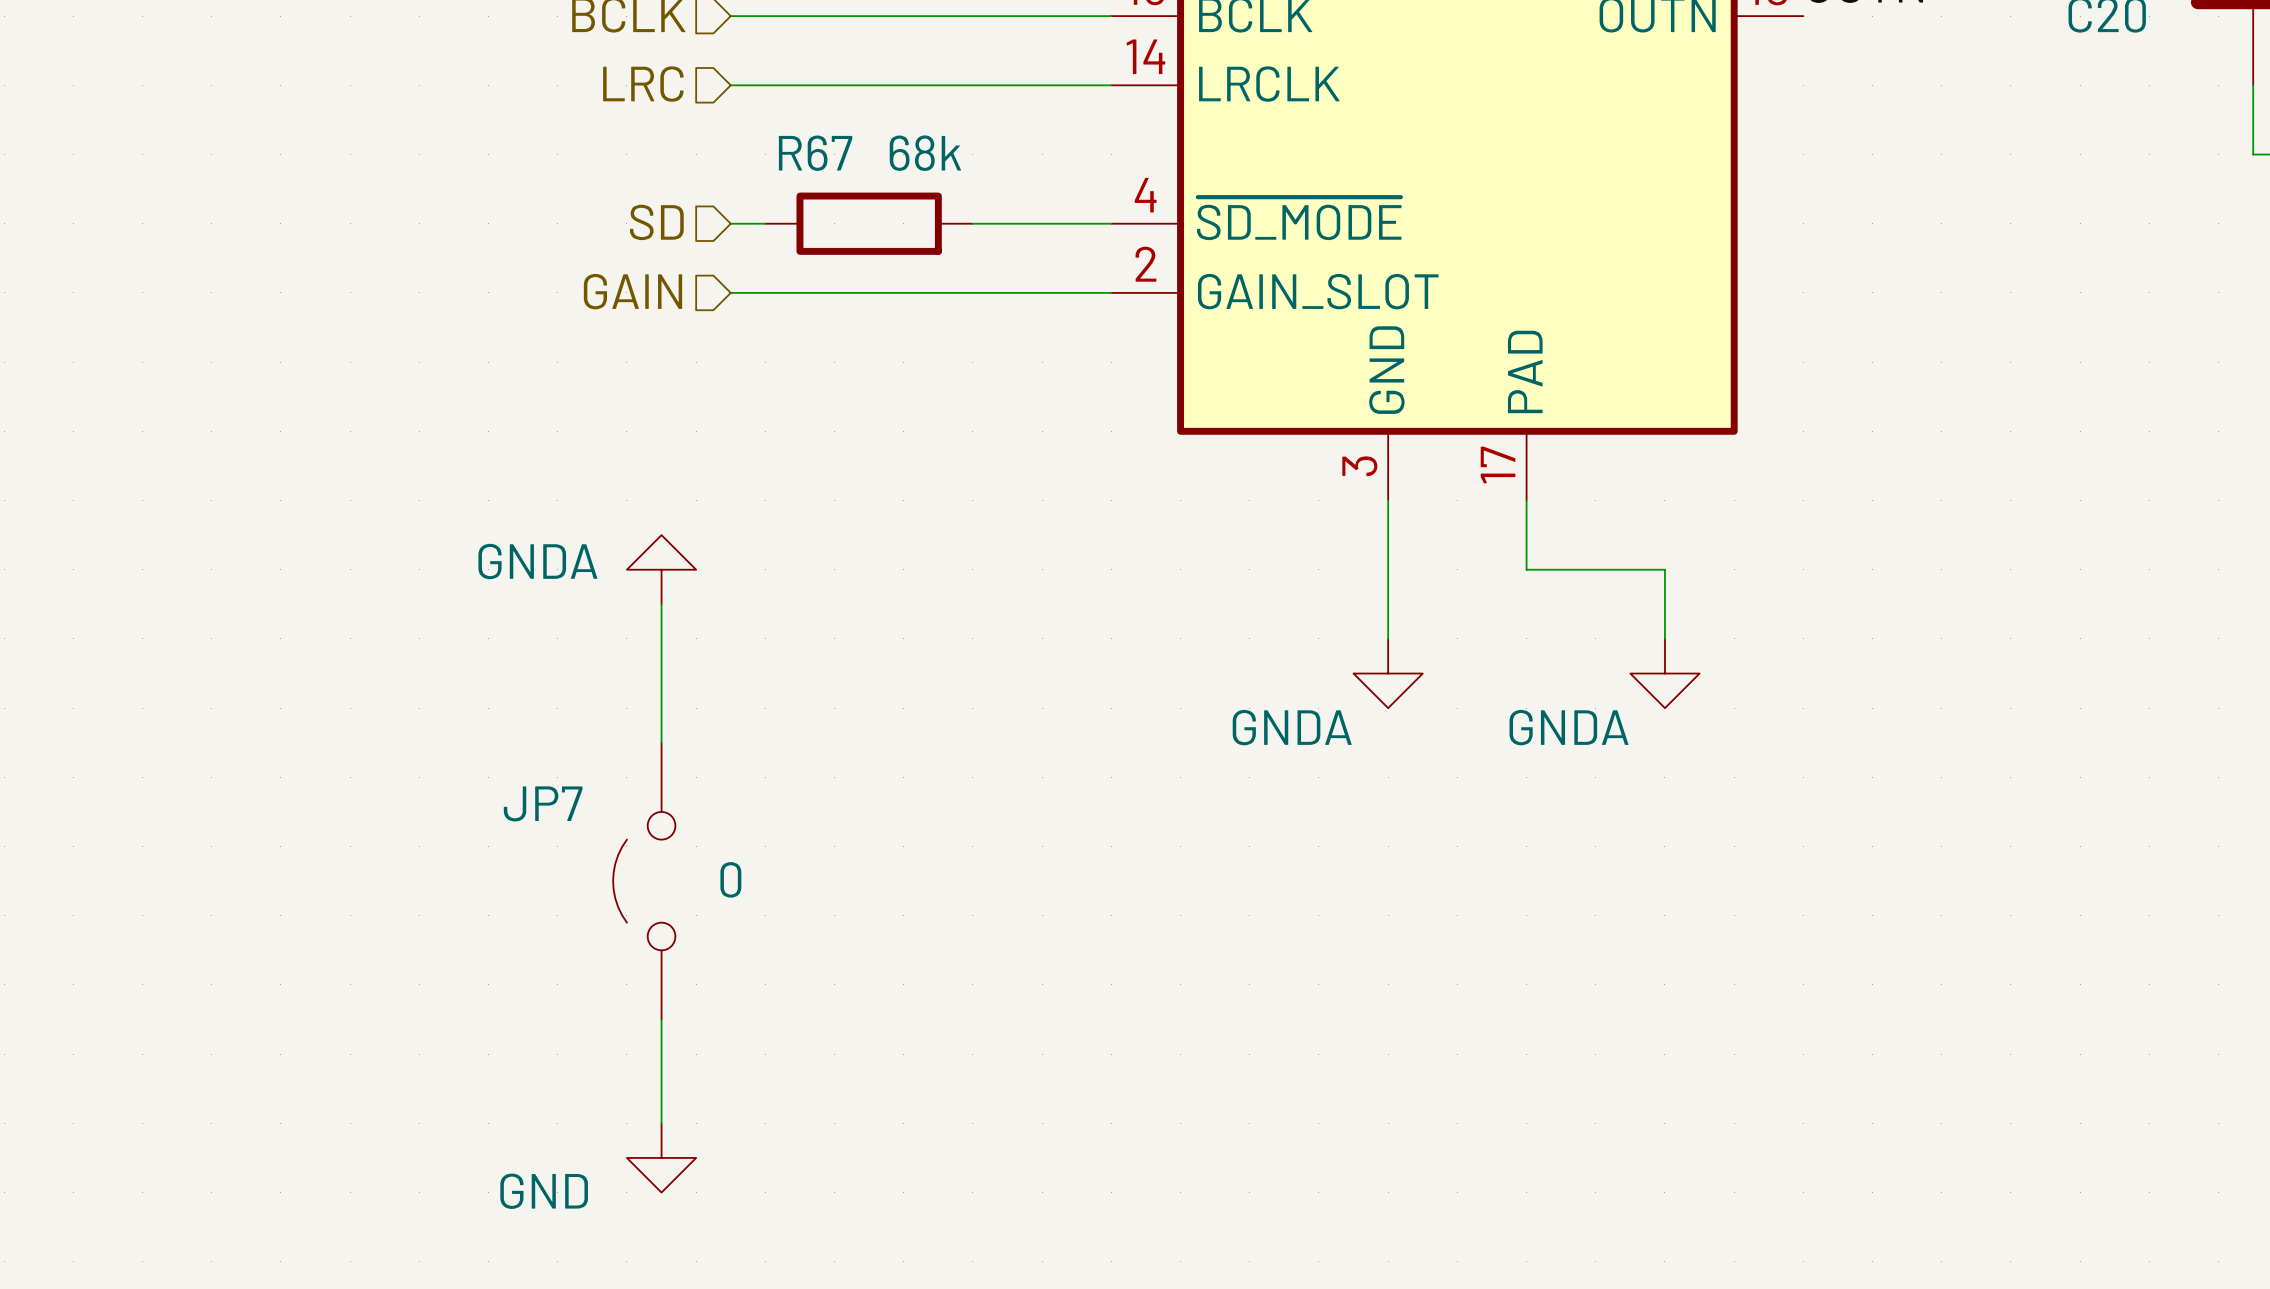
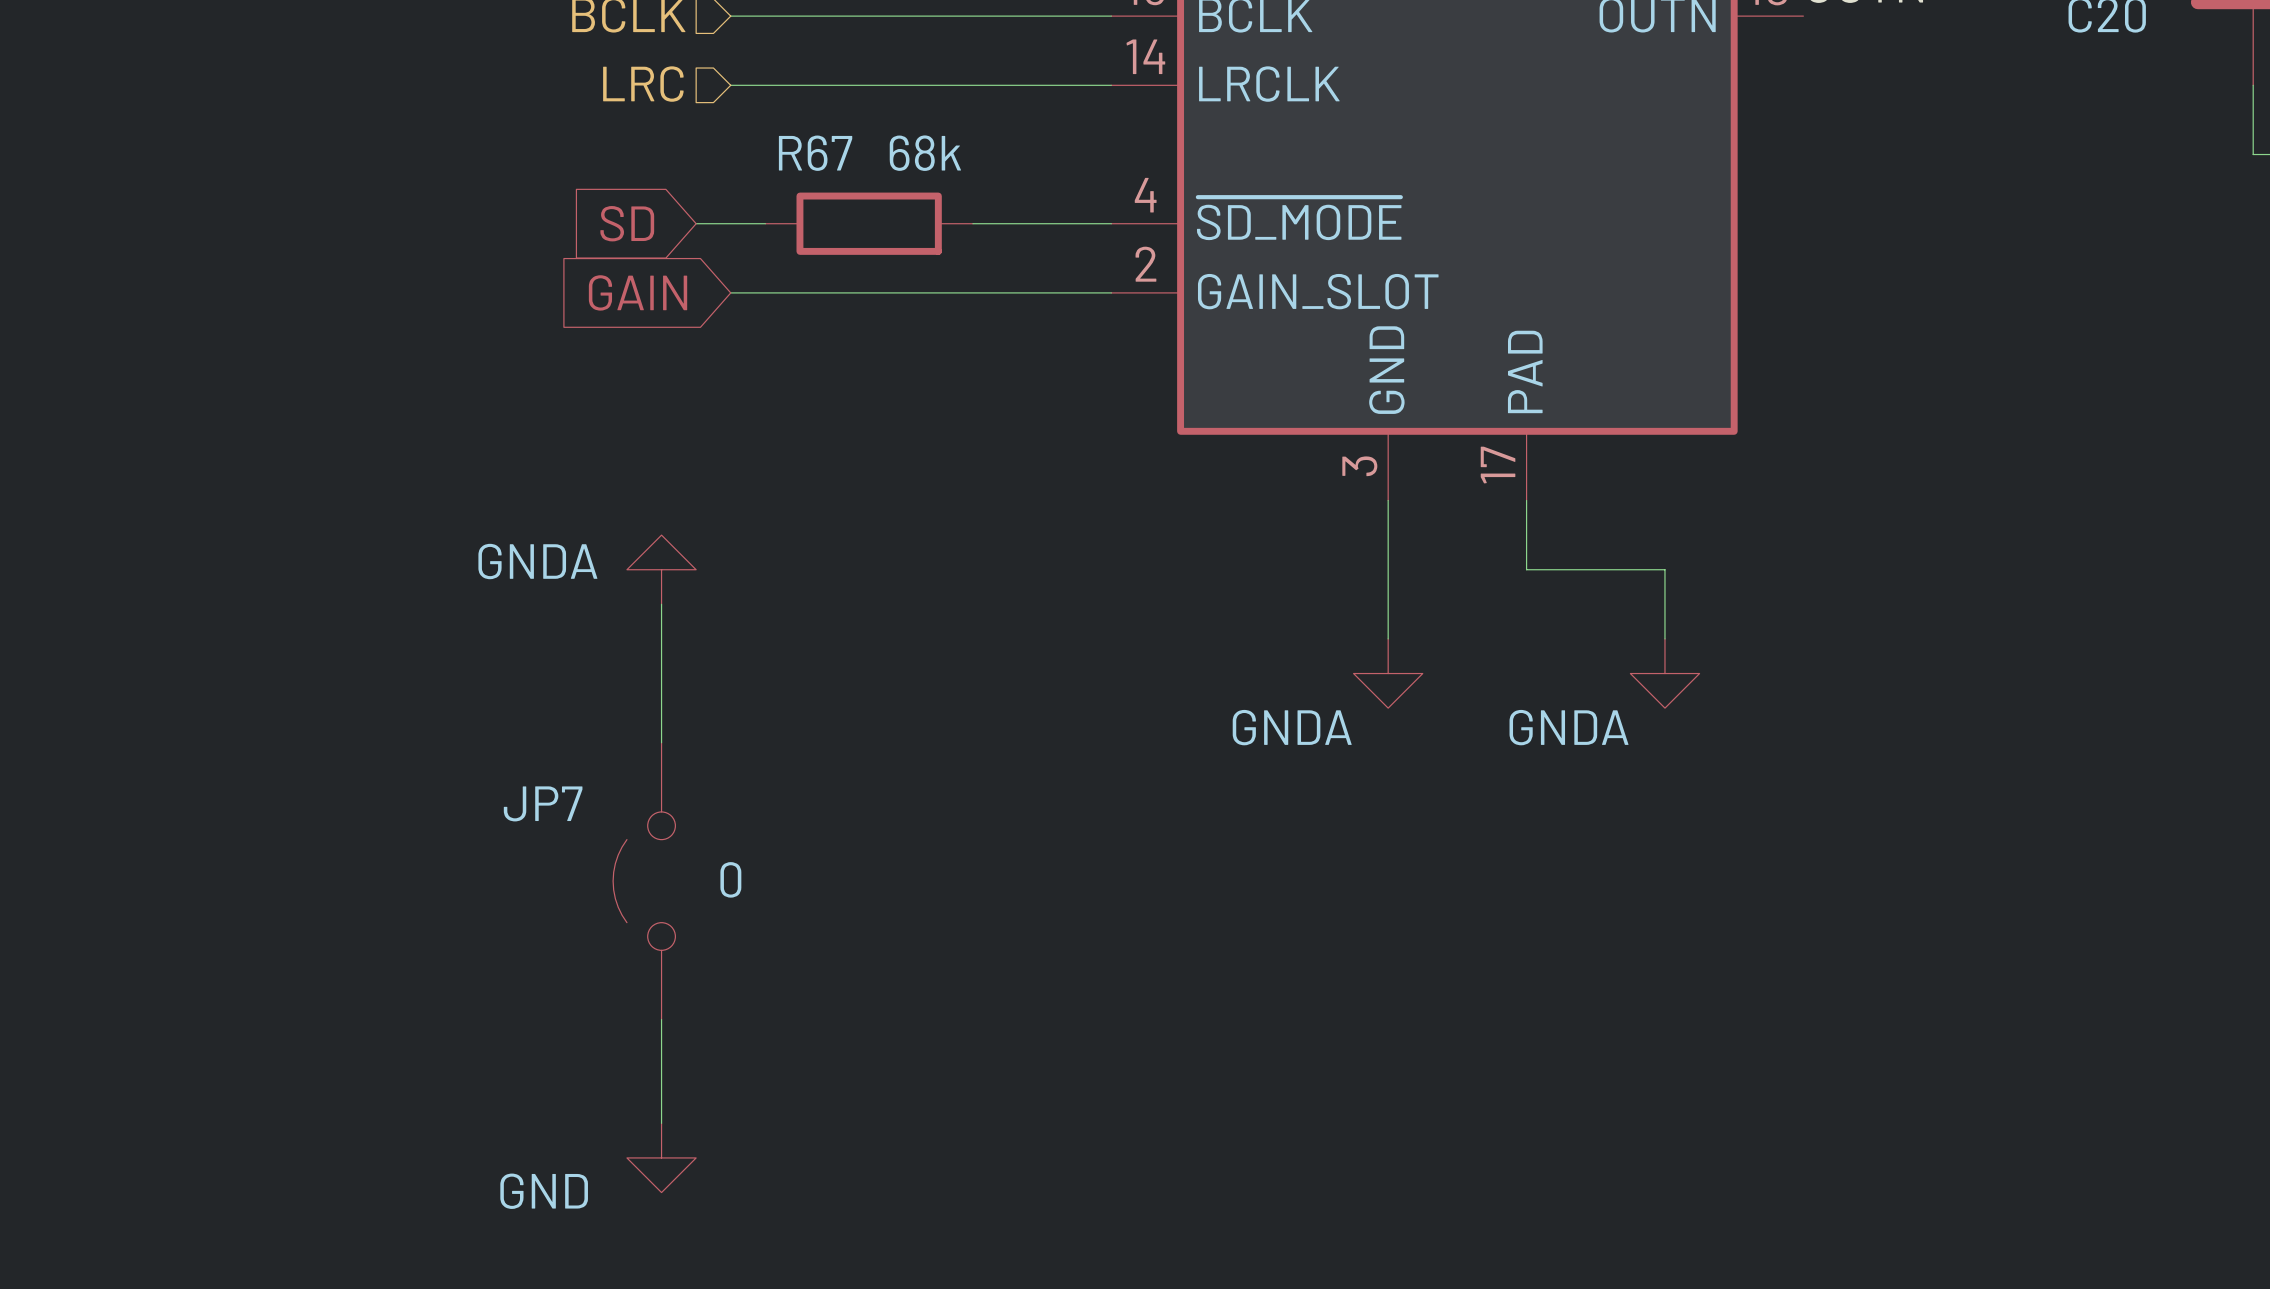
hierarchical label: SD (656, 222) -> none
global label: none -> SD (627, 223)
wire: none -> (696, 223) (730, 223)
hierarchical label: GAIN (633, 291) -> none
global label: none -> GAIN (638, 292)

